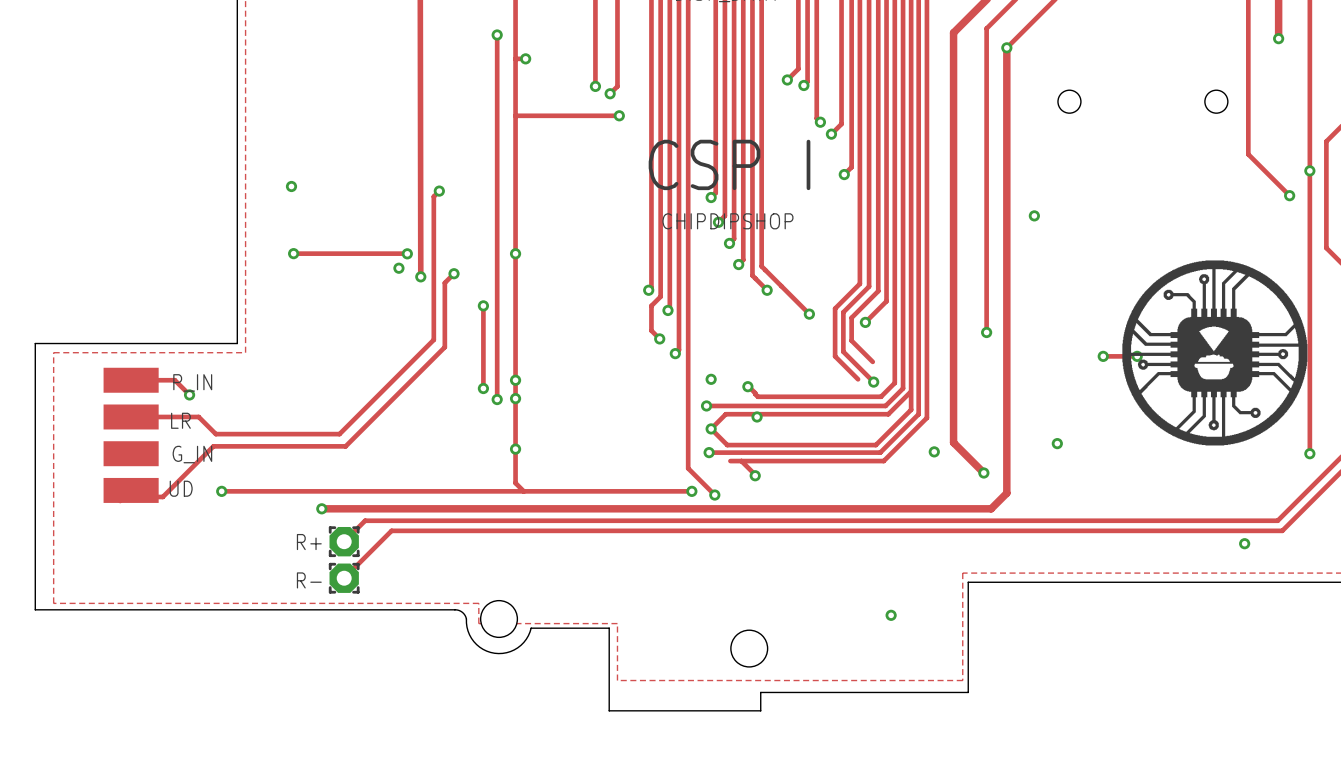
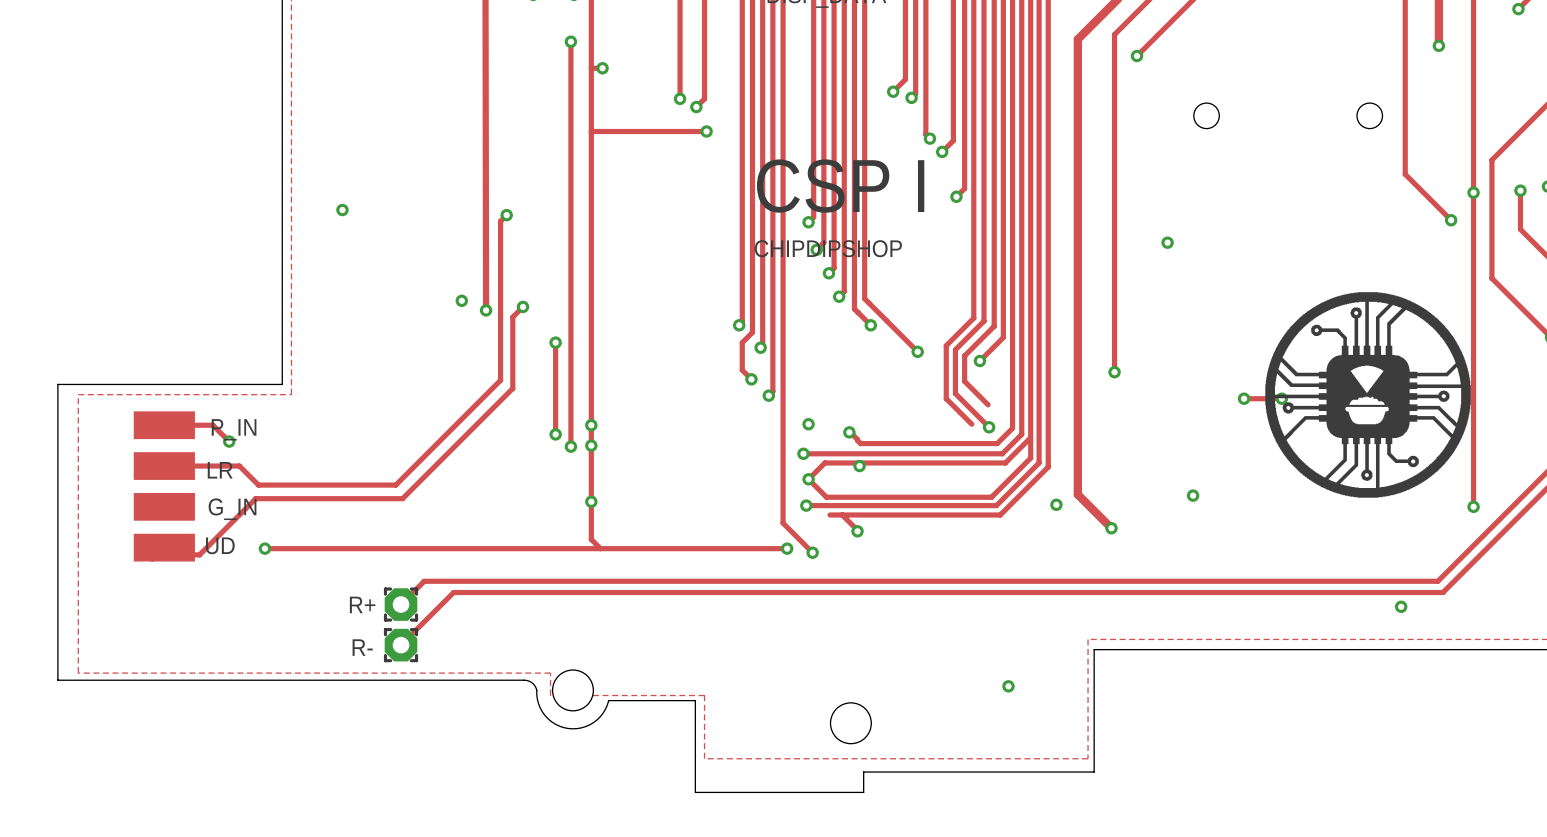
track: (1006, 47) (1006, 493) (991, 508) (321, 508) -> none
track: (293, 253) (407, 253) -> none
via: (293, 253) -> none
via: (407, 253) -> none
via: (515, 253) -> none
via: (321, 508) -> none

